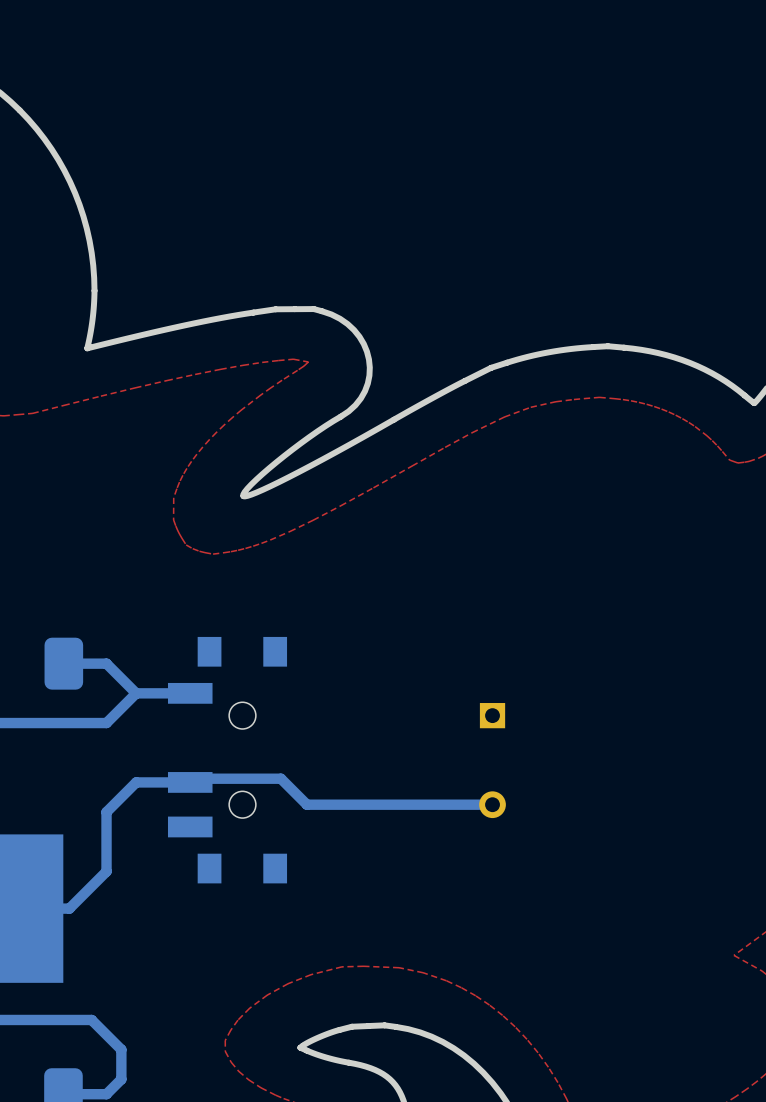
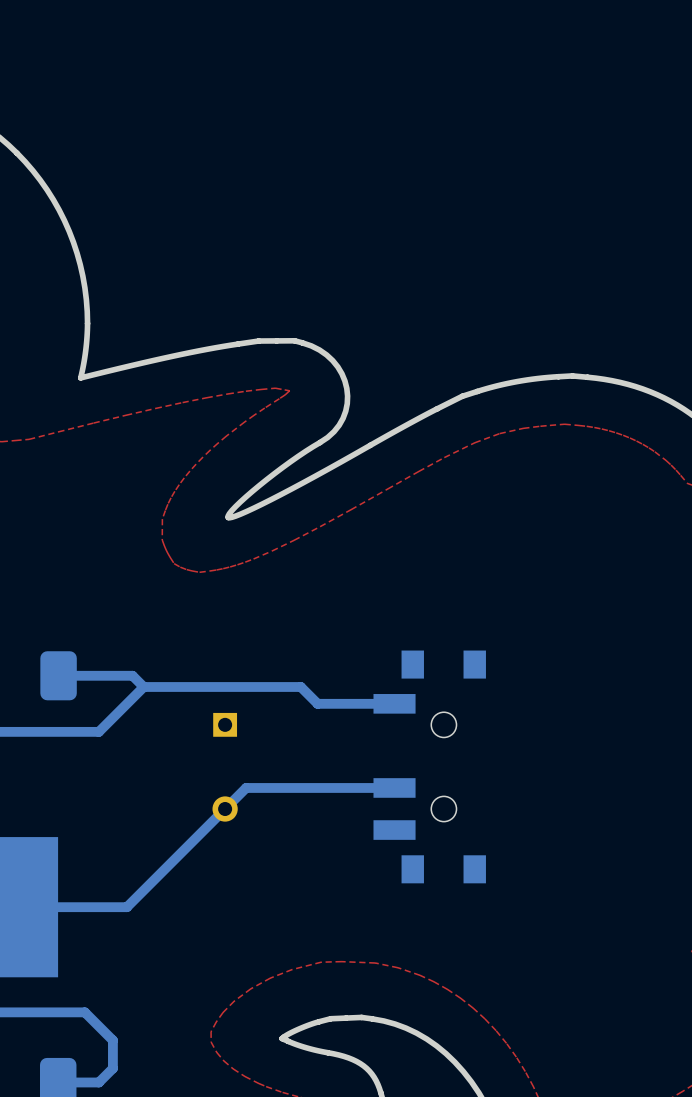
bottom track: (106, 663) (136, 693) (190, 693) -> (98, 675) (132, 675) (143, 686)
bottom track: none -> (143, 686) (126, 703)
bottom track: none -> (143, 686) (300, 686) (317, 703) (394, 703)
part position: (492, 715) -> (225, 724)
part position: (227, 760) -> (429, 766)
bottom track: (492, 804) (306, 804) (280, 778) (193, 778) (190, 782) (136, 782) (106, 812) (106, 871) (69, 908) -> (394, 787) (246, 787) (126, 907) (63, 907)
part position: (492, 804) -> (225, 809)

